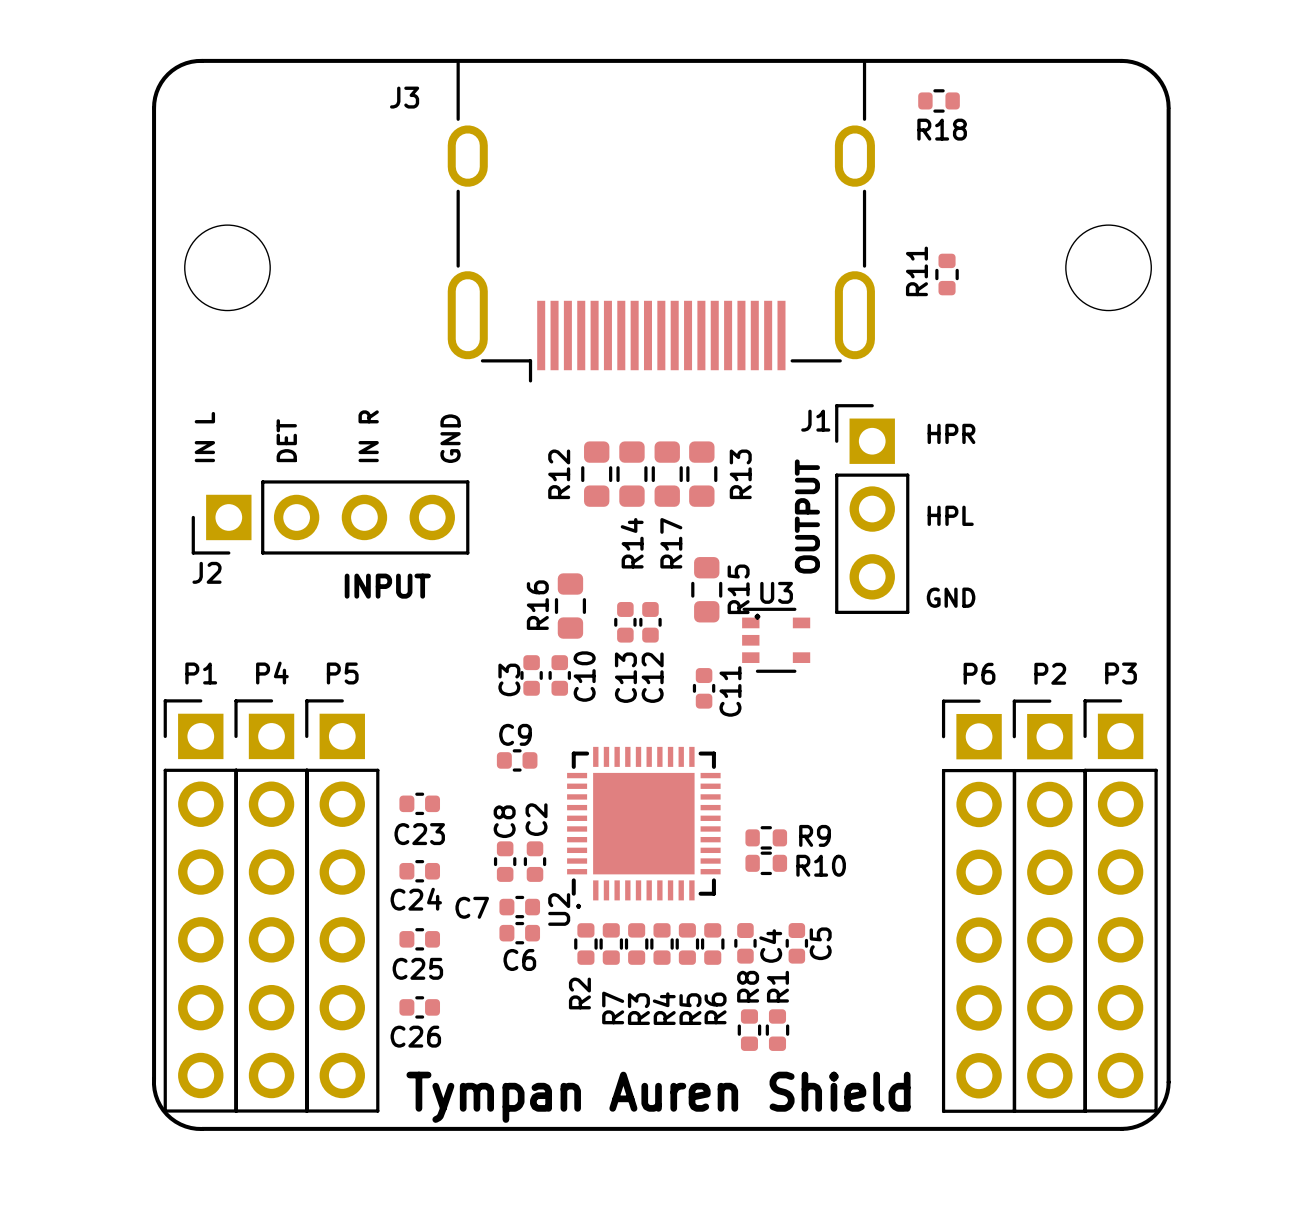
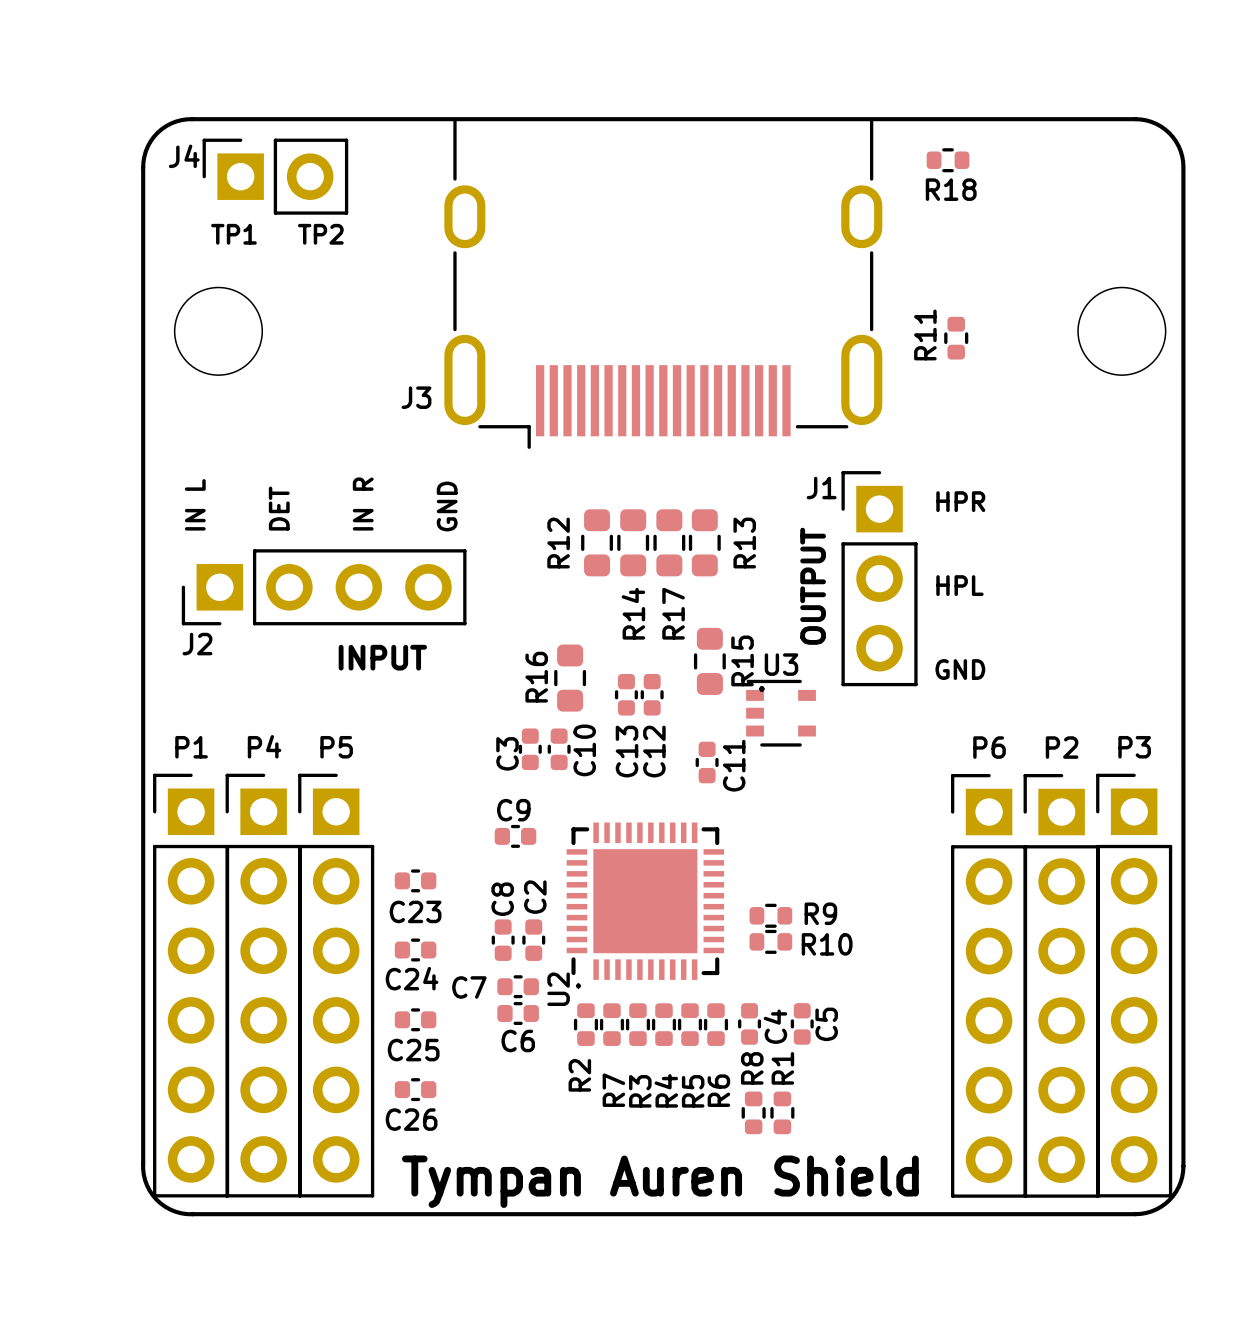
J3 name position: J3 (404, 97) -> J3 (416, 397)
J4: none -> (275, 176)
text: none -> TP1 TP2 (277, 234)

